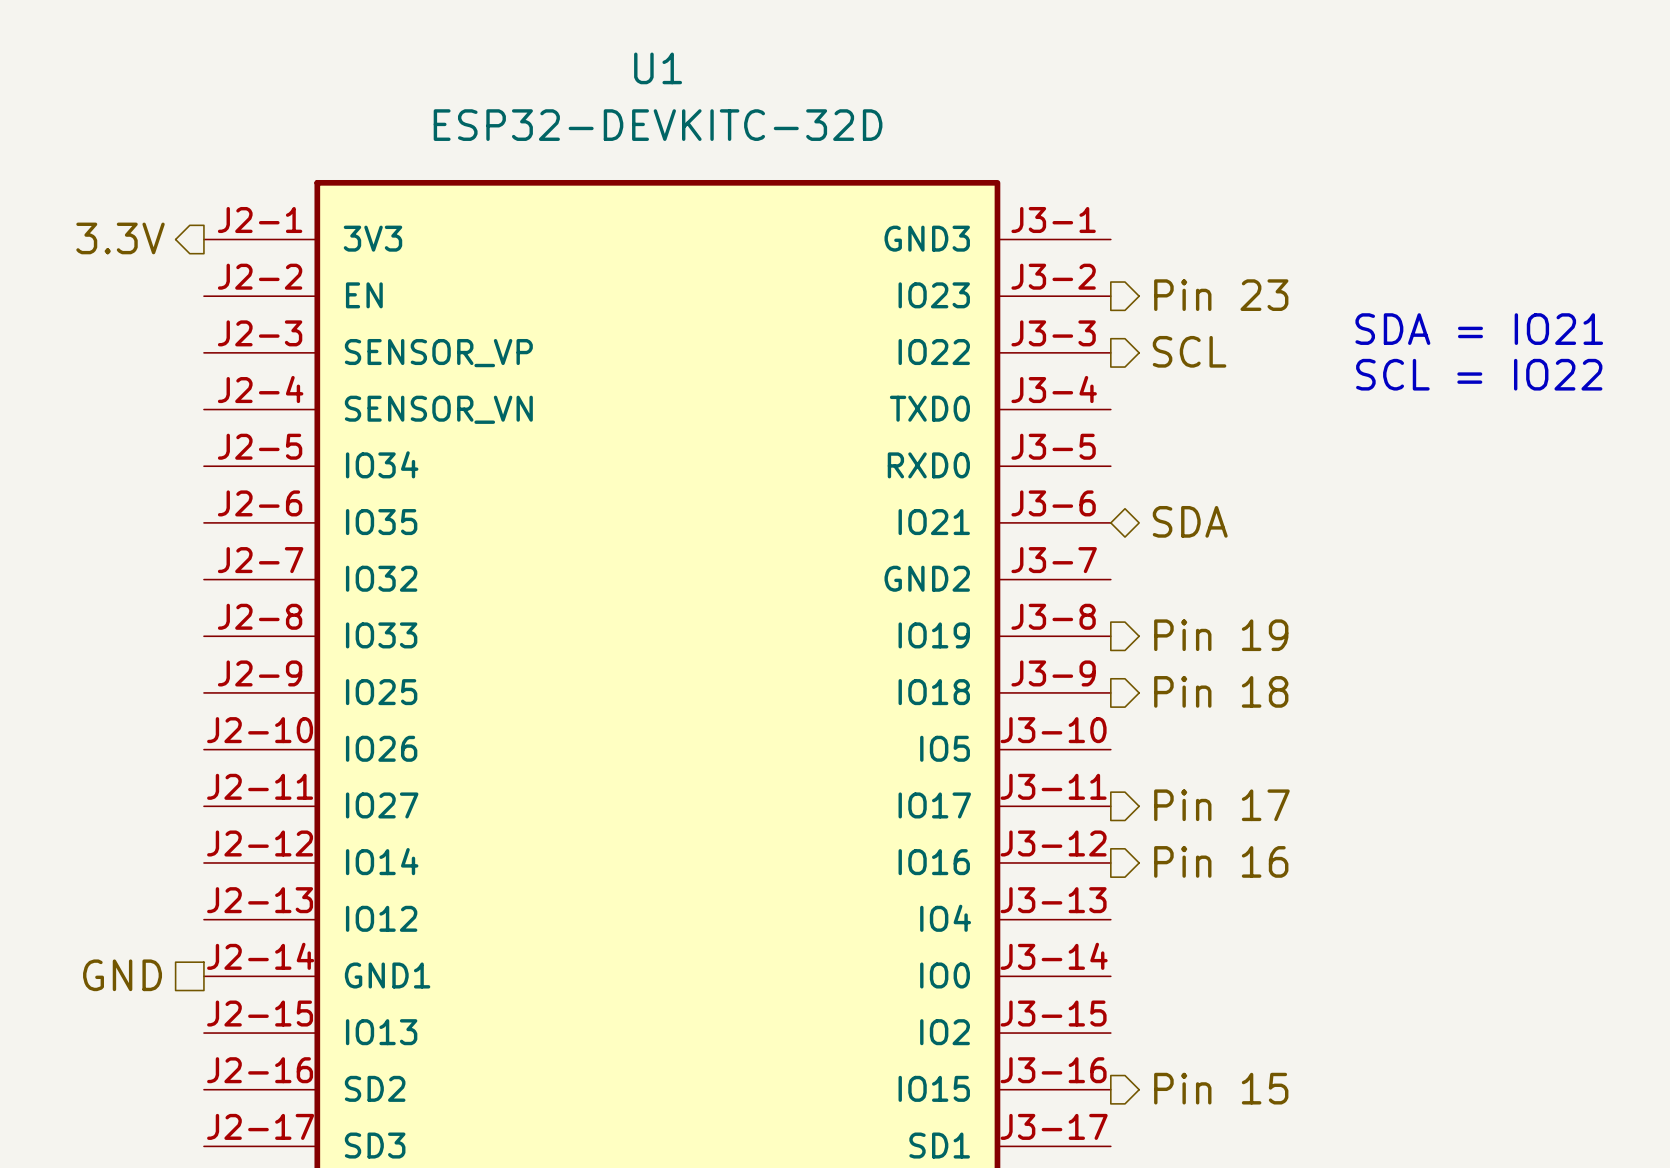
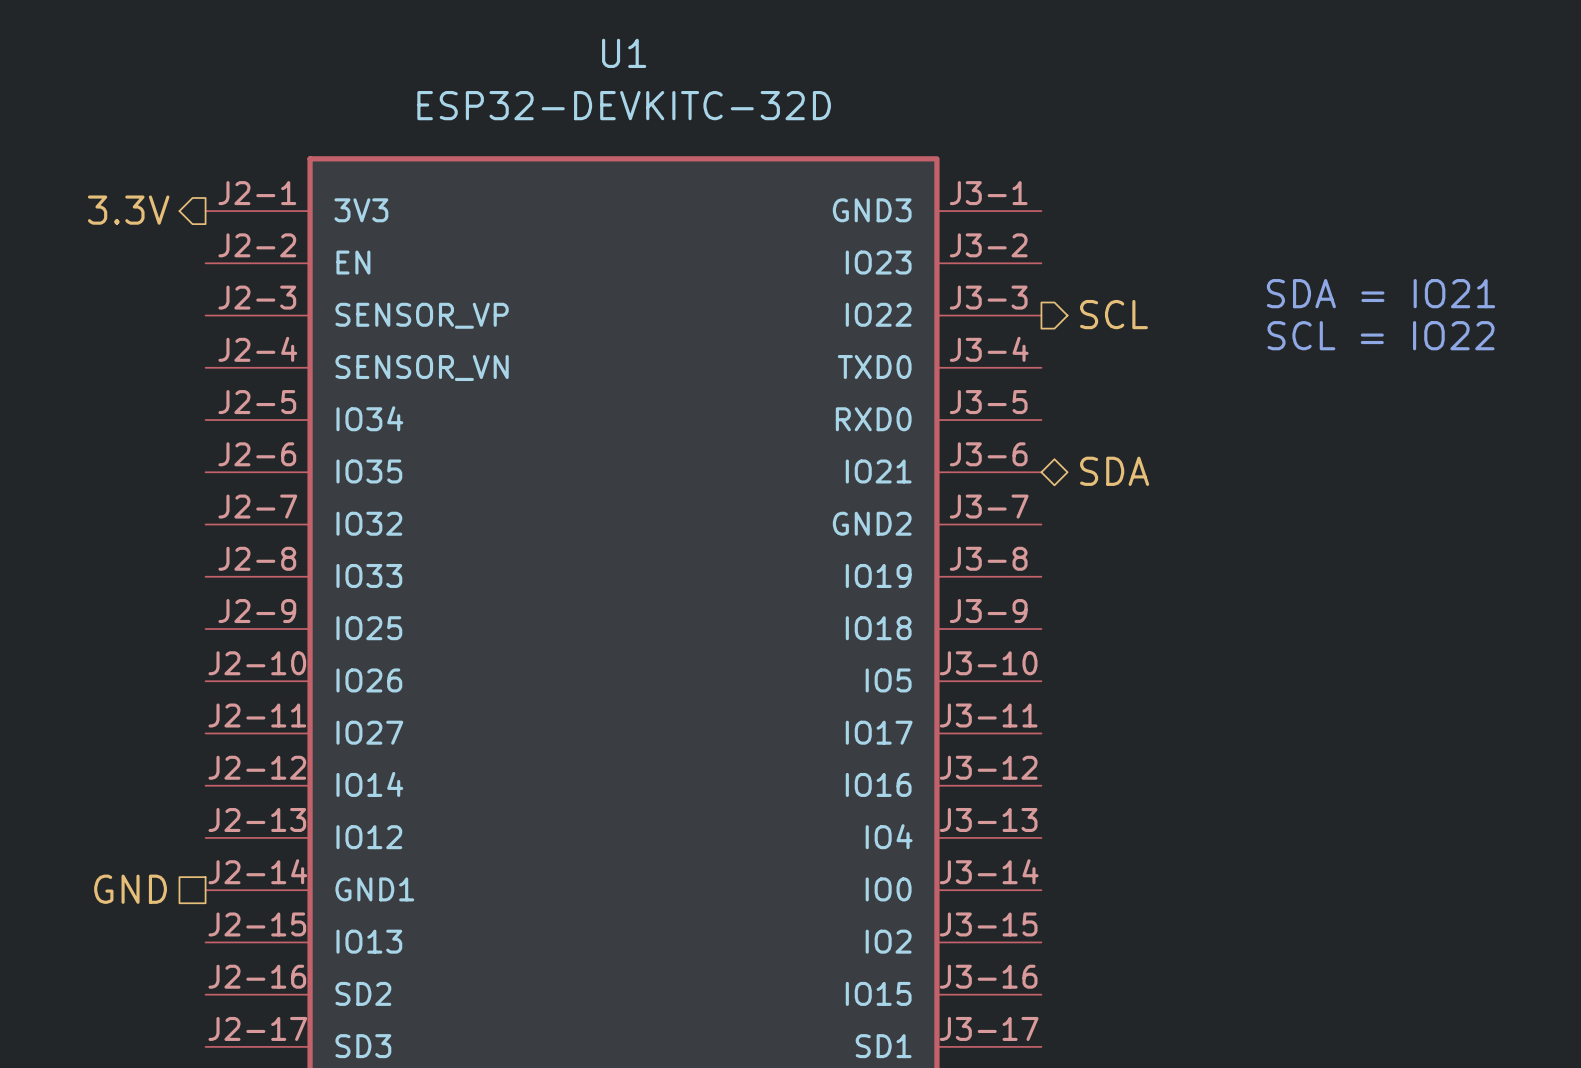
hierarchical label: Pin 23 (1221, 295) -> none
hierarchical label: Pin 19 (1221, 635) -> none
hierarchical label: Pin 18 (1221, 691) -> none
hierarchical label: Pin 17 (1221, 805) -> none
hierarchical label: Pin 16 (1221, 861) -> none
hierarchical label: Pin 15 (1221, 1088) -> none

